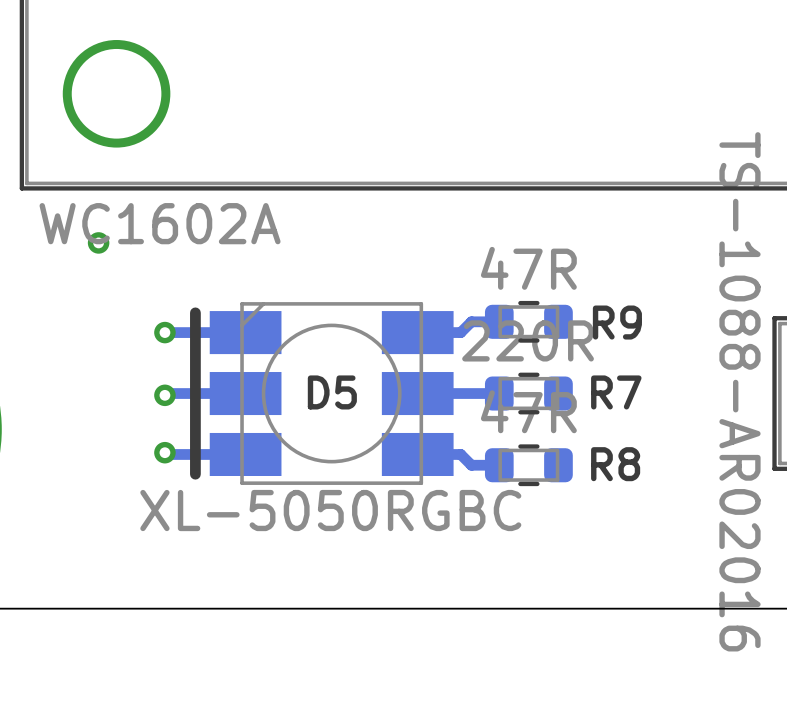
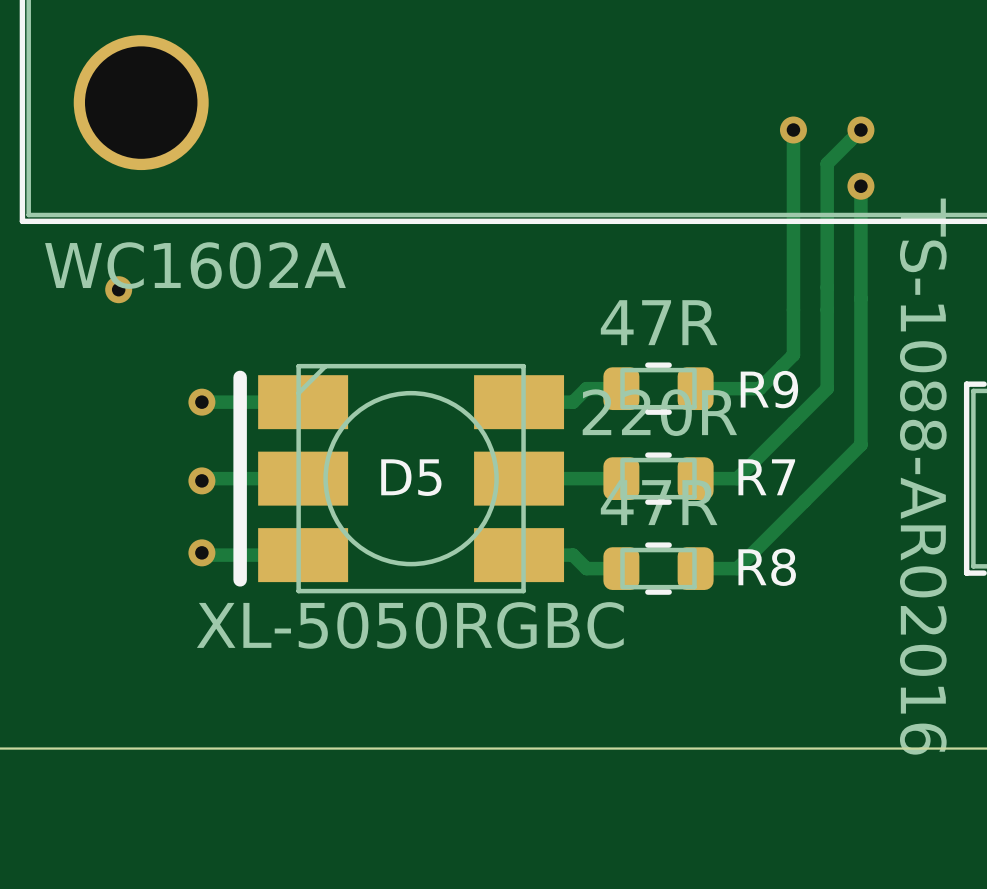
track: none -> (793, 130) (793, 354) (759, 388) (695, 388)
via: none -> (793, 130)
track: none -> (860, 130) (827, 163) (827, 388) (737, 478) (695, 478)
via: none -> (860, 130)
track: none -> (860, 186) (860, 444) (737, 568) (695, 568)
via: none -> (860, 186)

